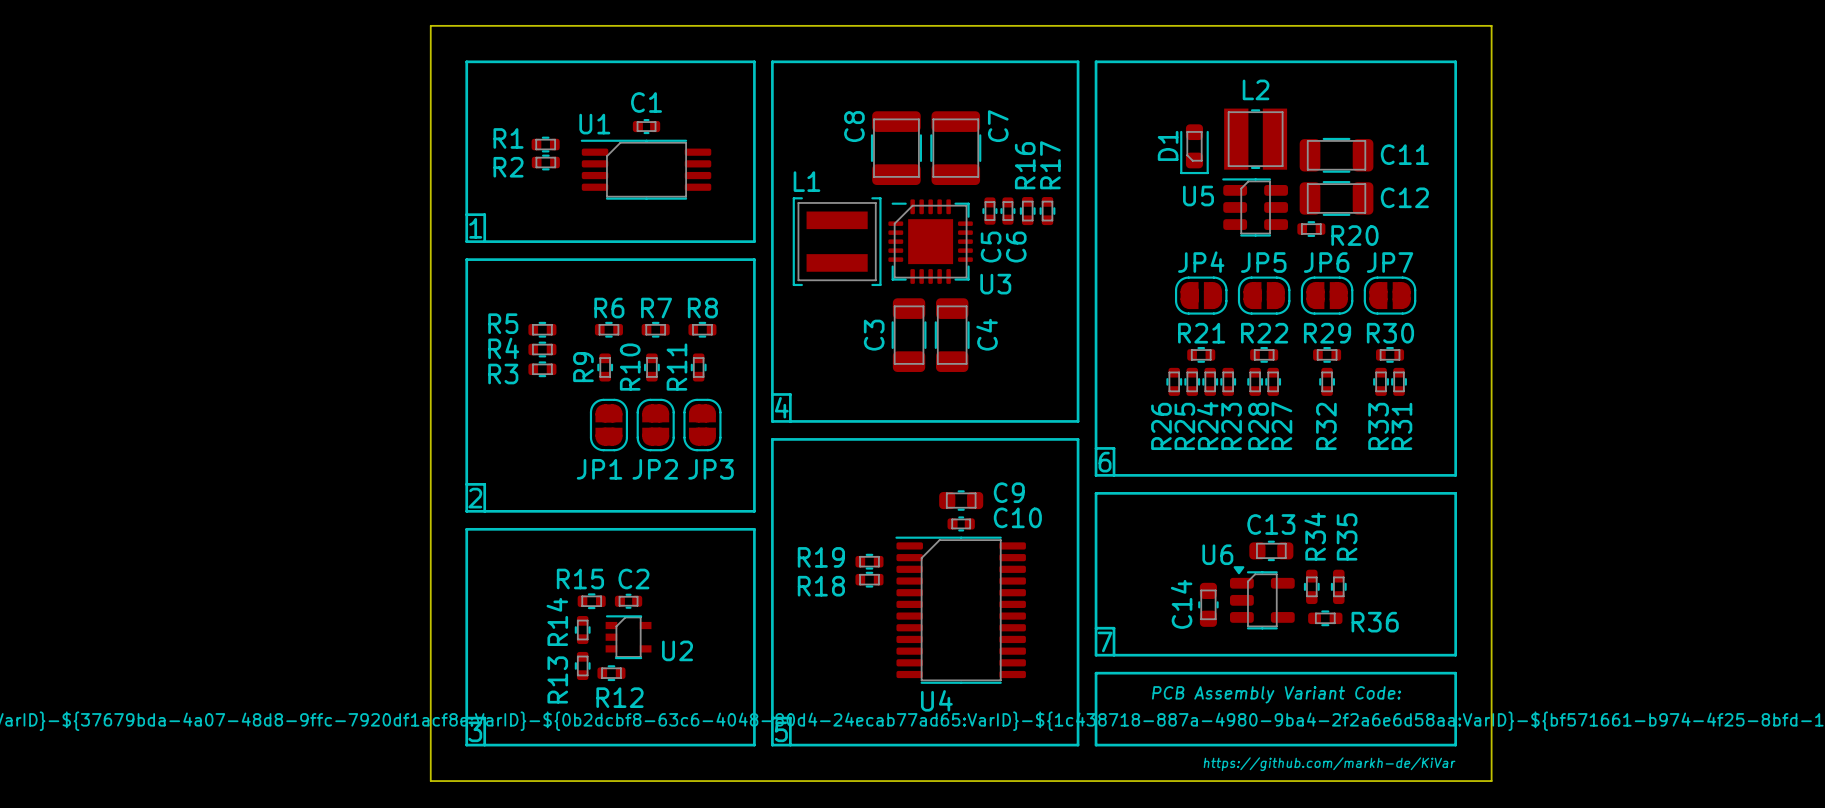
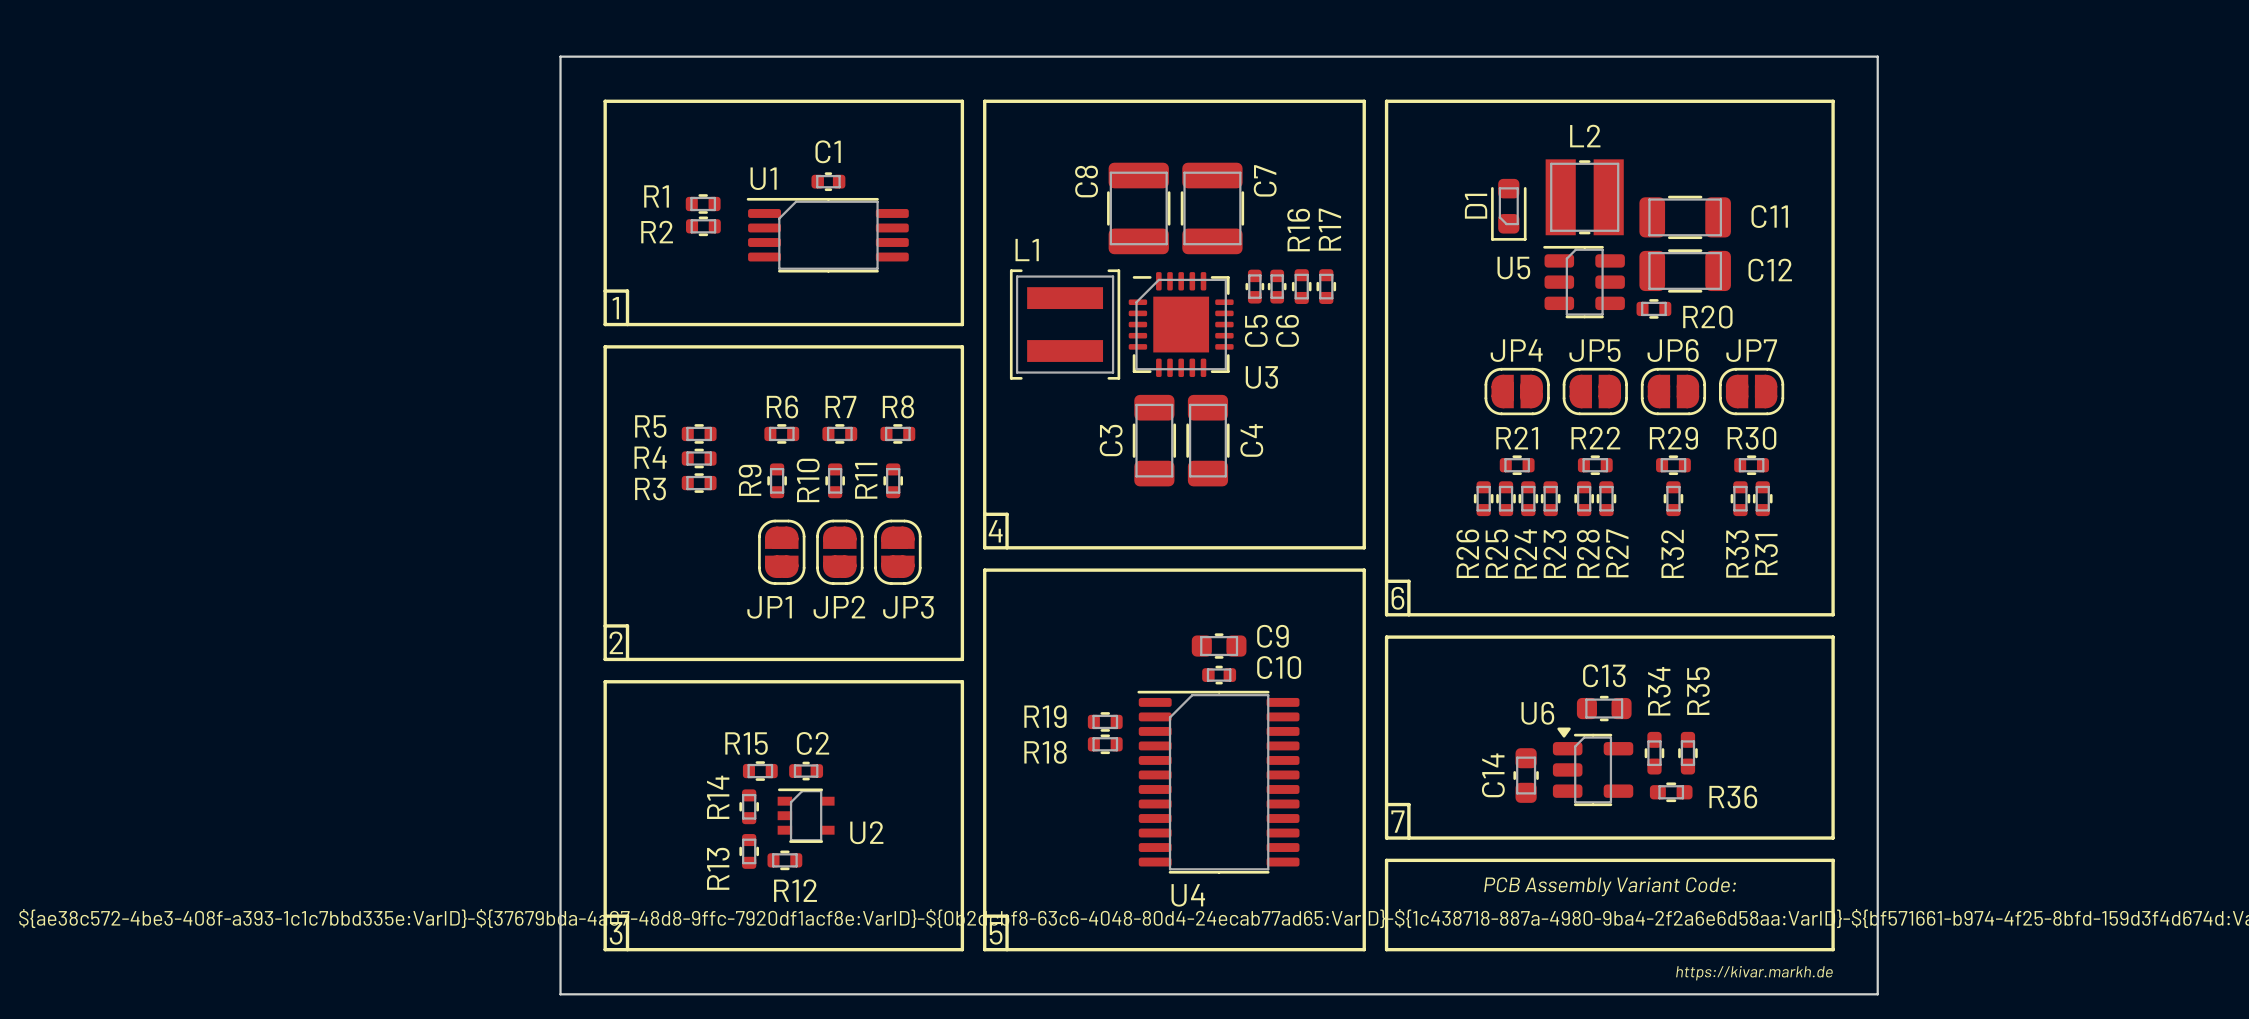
text: https://github.com/markh-de/KiVar (1329, 764) -> https://kivar.markh.de (1754, 973)

